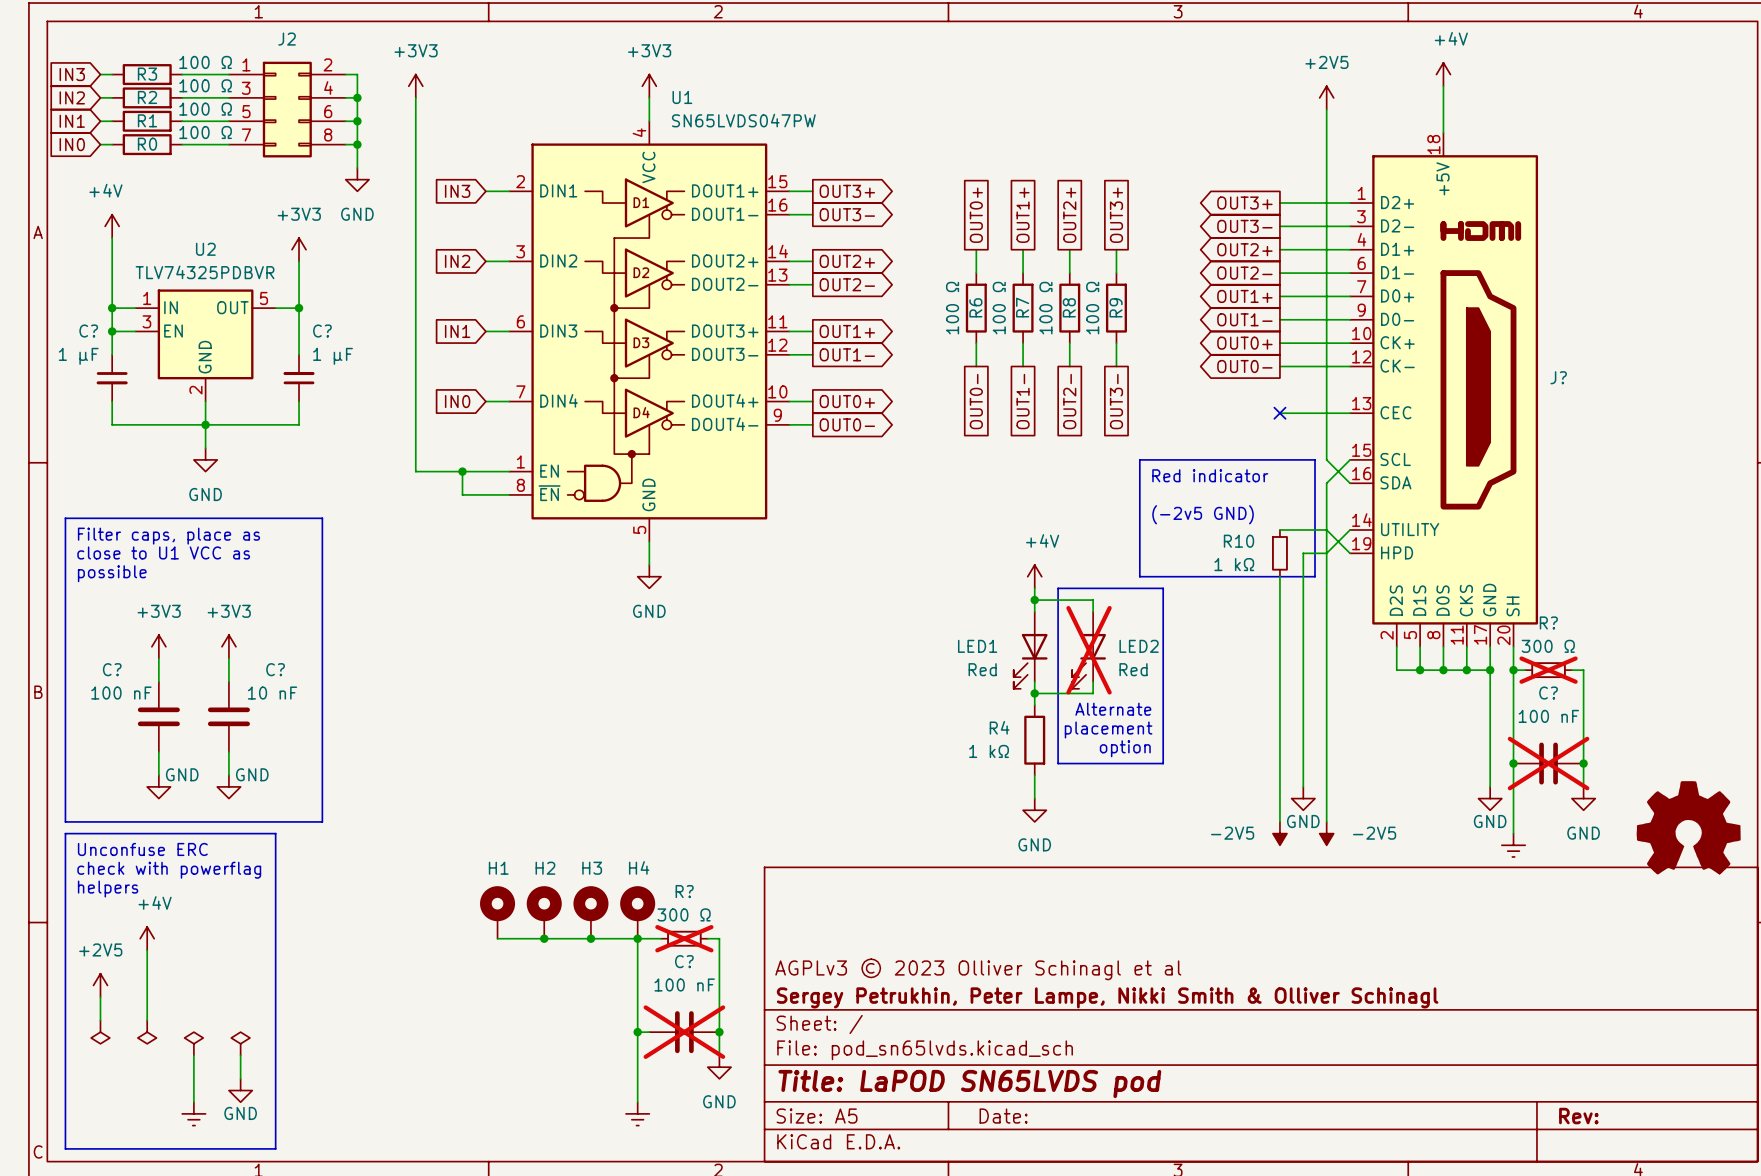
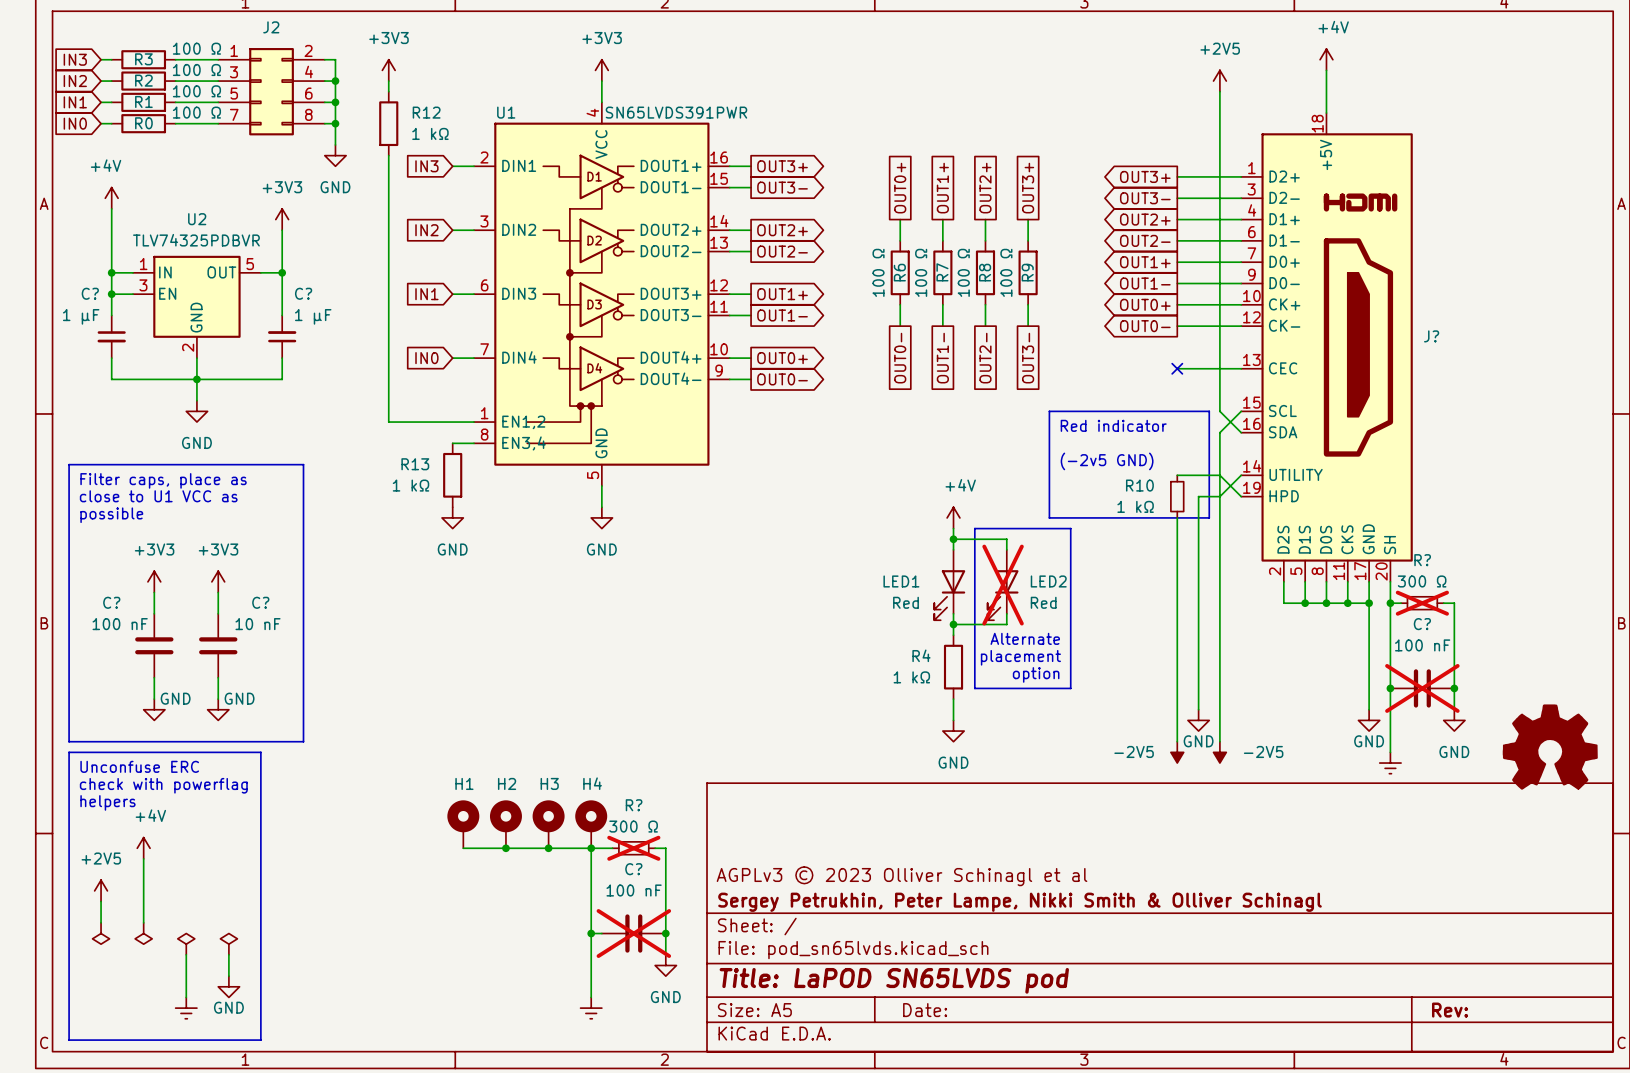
U1 name position: U1 (682, 97) -> U1 (506, 112)
wire: (415, 109) (415, 179) -> none
U1 value: SN65LVDS047PW (743, 120) -> SN65LVDS391PWR (676, 112)
U1 symbol: [509, 121, 790, 542] -> [474, 102, 730, 486]
R12: none -> 1 kΩ (388, 123)
wire: (462, 471) (462, 494) (485, 494) -> none
junction: (462, 471) -> none
R13: none -> 1 kΩ (452, 475)
power symbol: none -> GND (452, 517)

